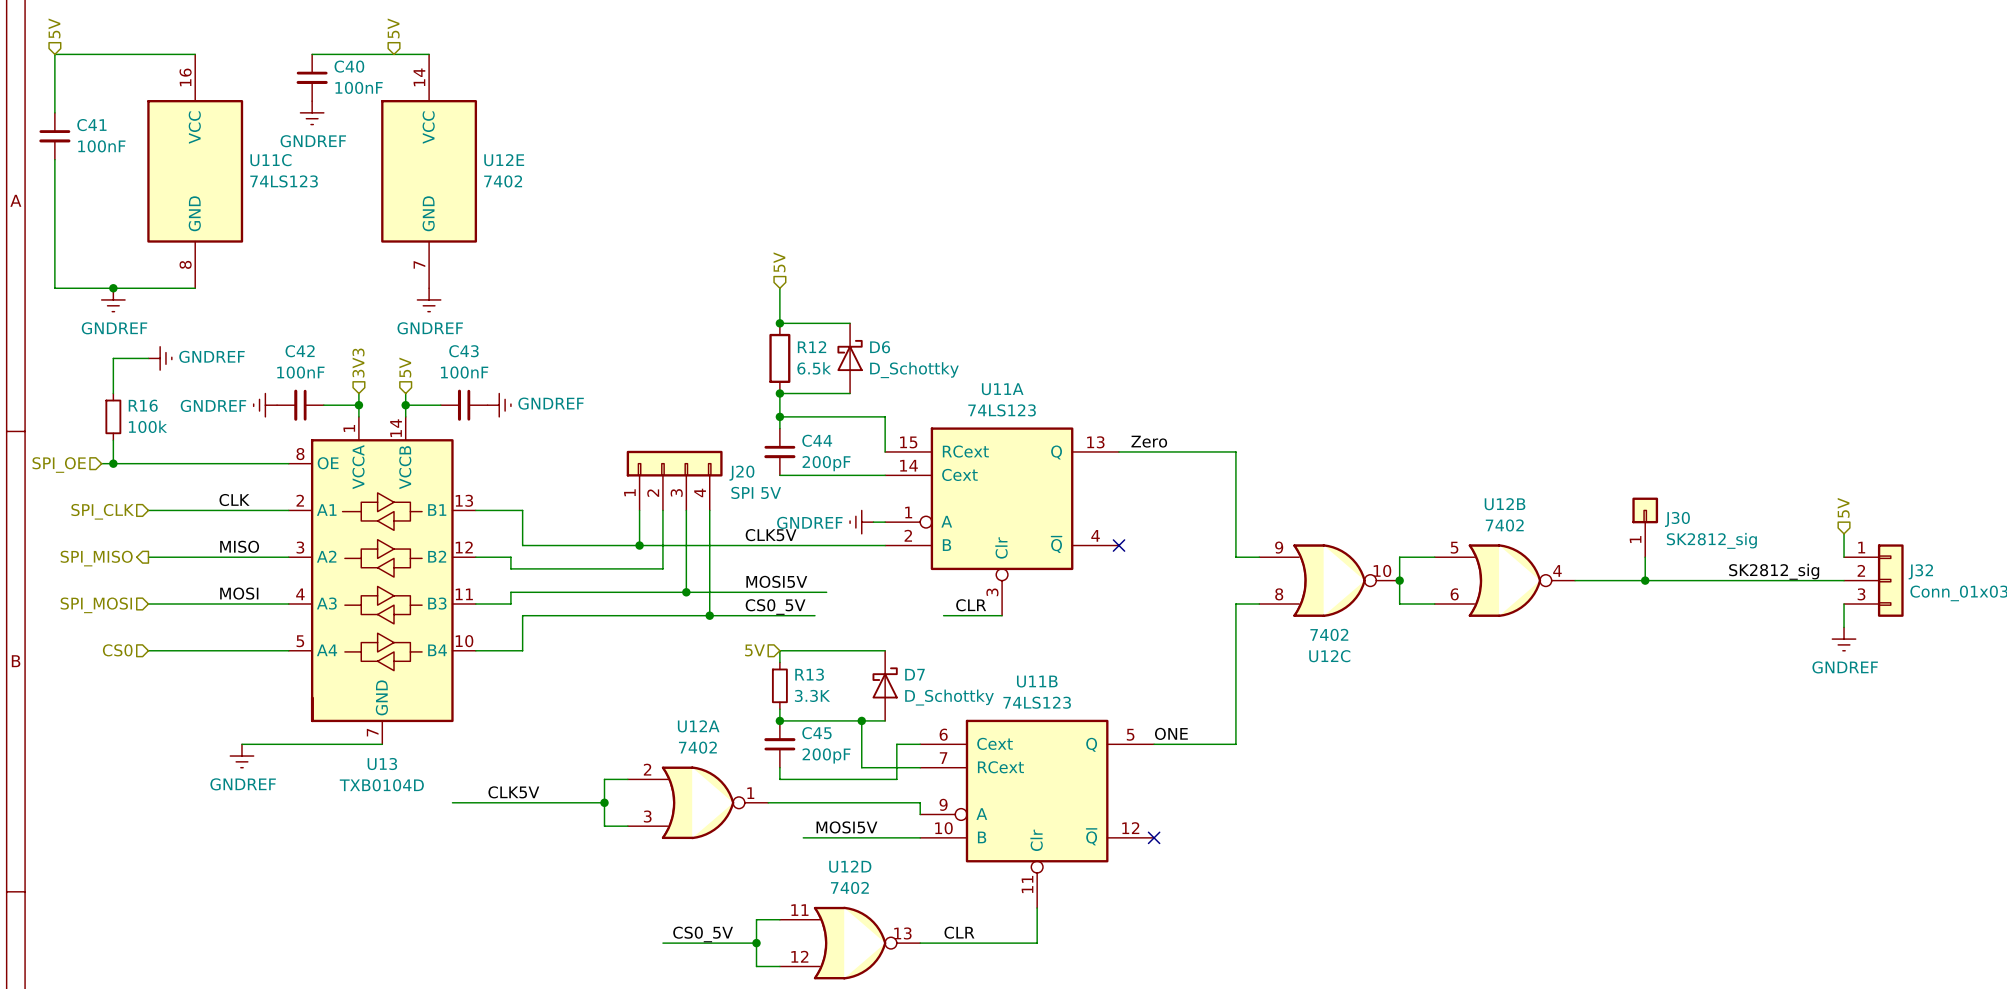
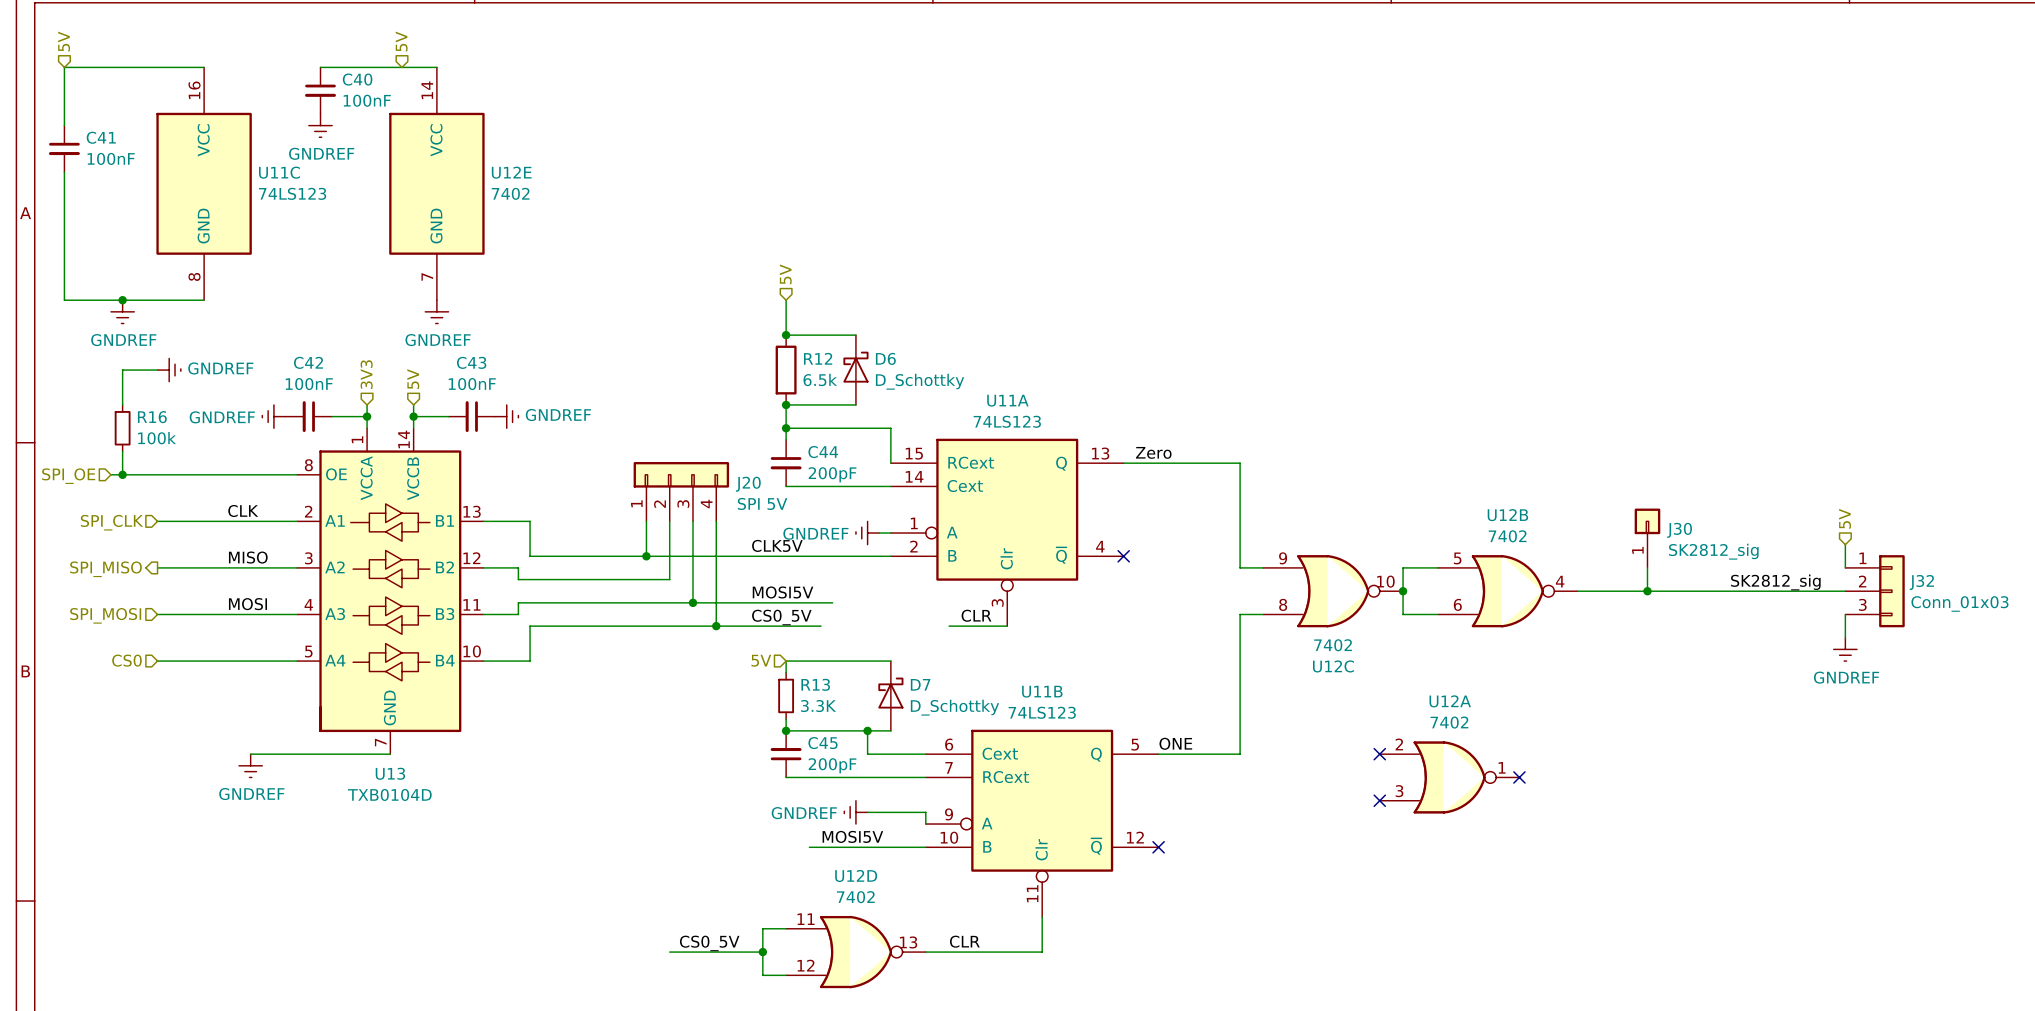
wire: (861, 744) (861, 767) -> (867, 754) (902, 754)
wire: (896, 744) (896, 779) (779, 779) (779, 767) -> (867, 777) (786, 777)
no-connect mark: none -> (1379, 754)
no-connect mark: none -> (1519, 777)
wire: (627, 779) (604, 779) (604, 826) (627, 826) -> none
no-connect mark: none -> (1379, 800)
label: CLK5V (513, 792) -> none
wire: (452, 802) (604, 802) -> none
junction: (604, 802) -> none
U12A position: (698, 802) -> (1449, 777)
wire: (768, 802) (861, 802) -> none
power symbol: none -> GNDREF (855, 812)

